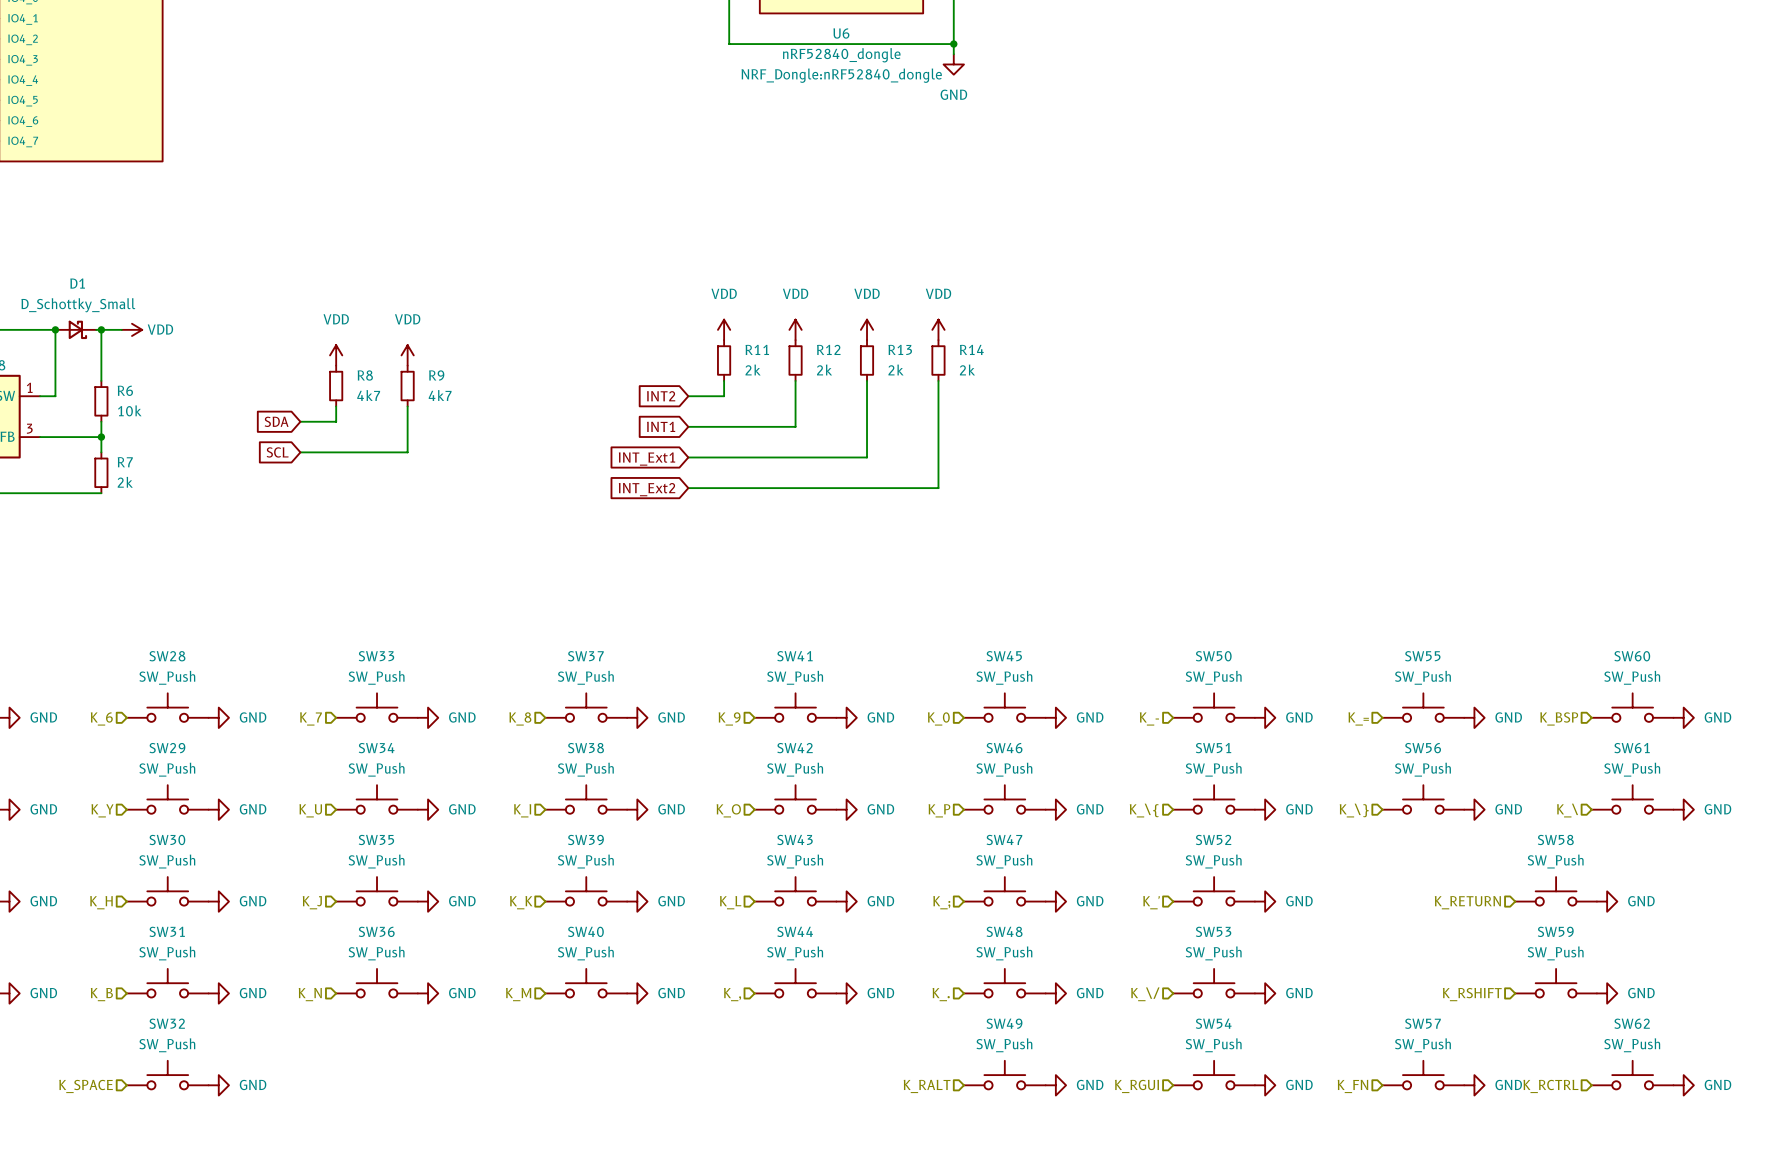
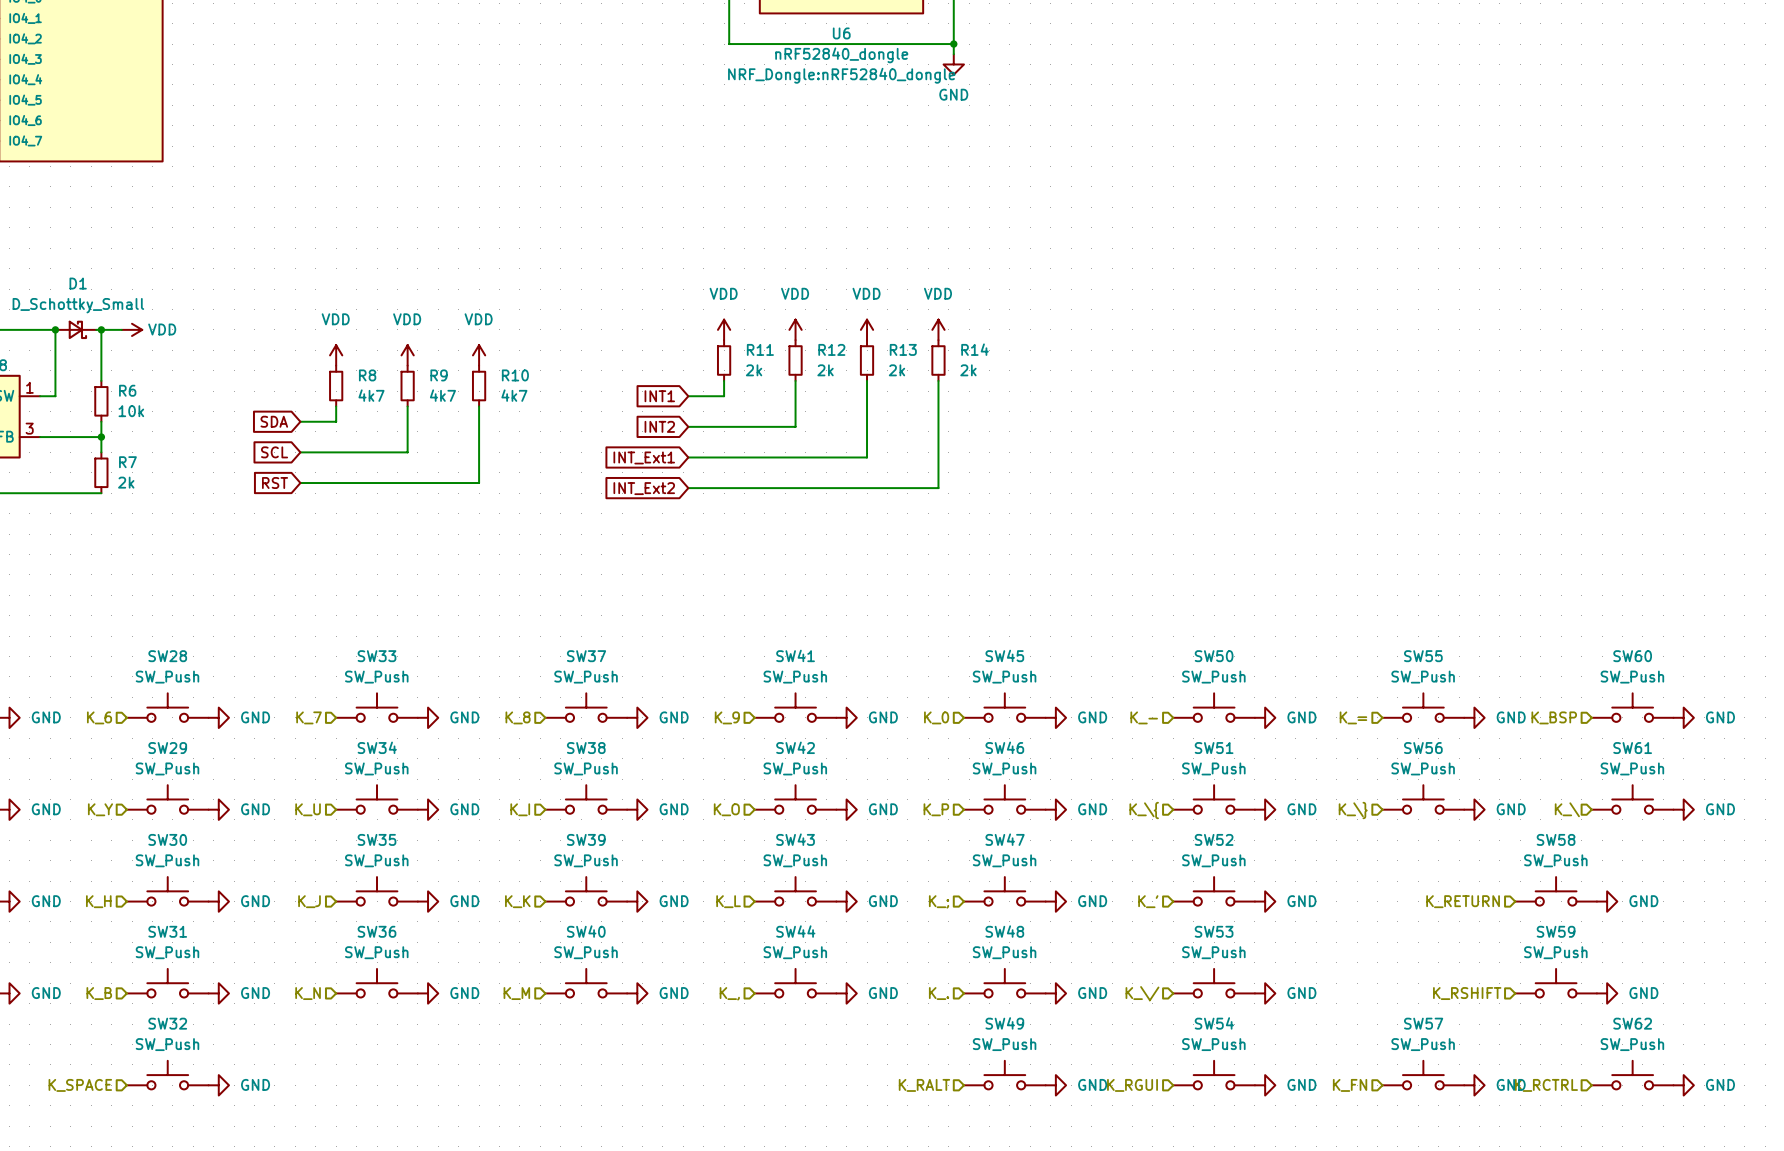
power symbol: none -> VDD (479, 355)
R10: none -> 4k7 (479, 386)
global label: INT2 (661, 396) -> INT1 (659, 396)
wire: none -> (479, 406) (479, 483) (300, 483)
global label: INT1 (661, 426) -> INT2 (659, 426)
global label: none -> RST (275, 483)

